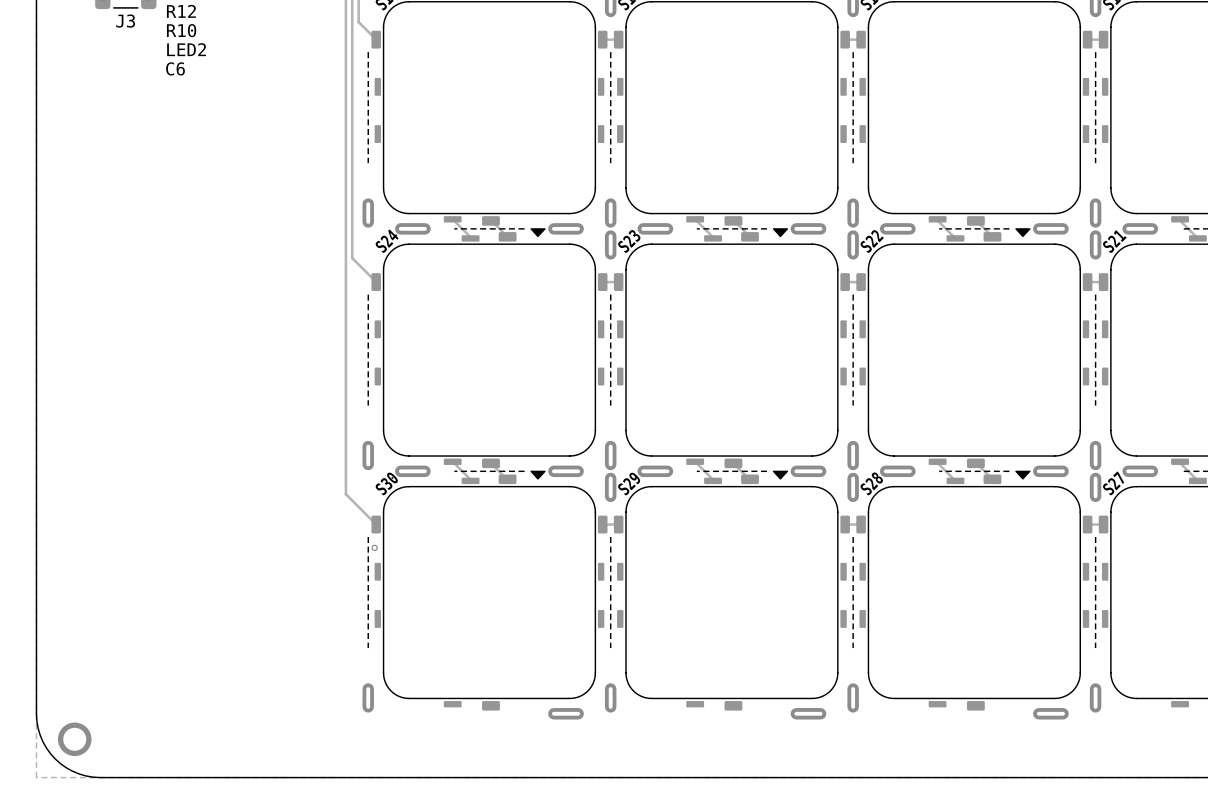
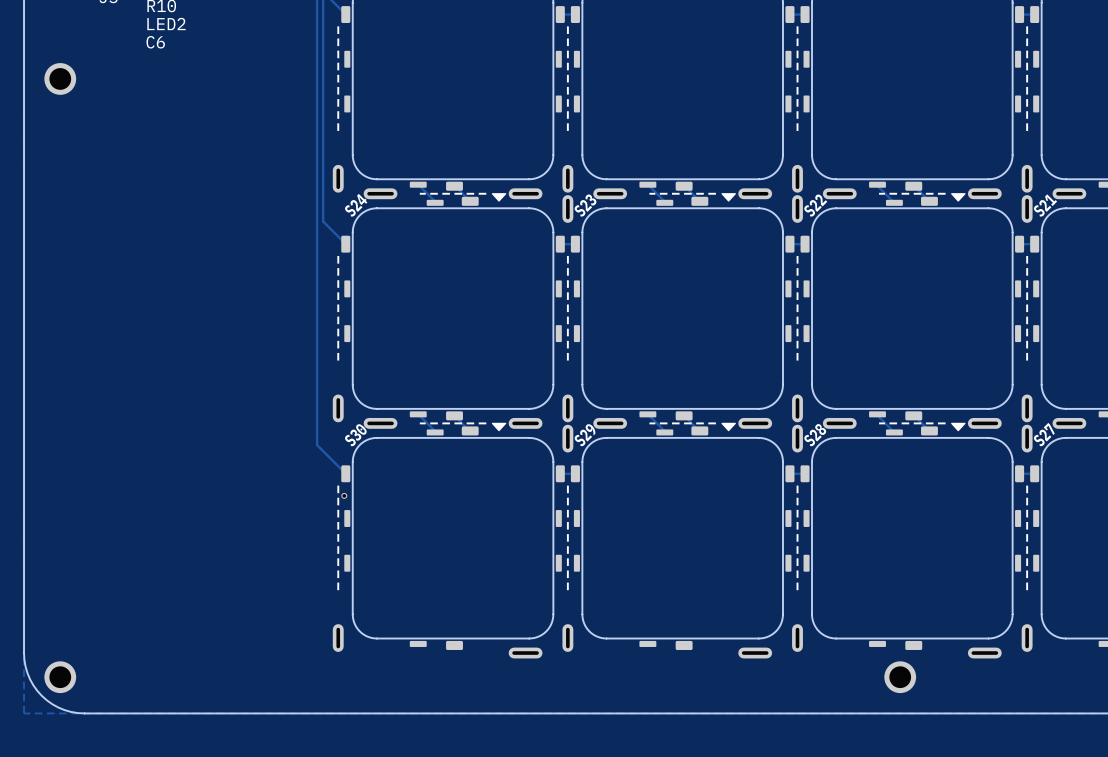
part: none -> (60, 78)
part: none -> (900, 677)

